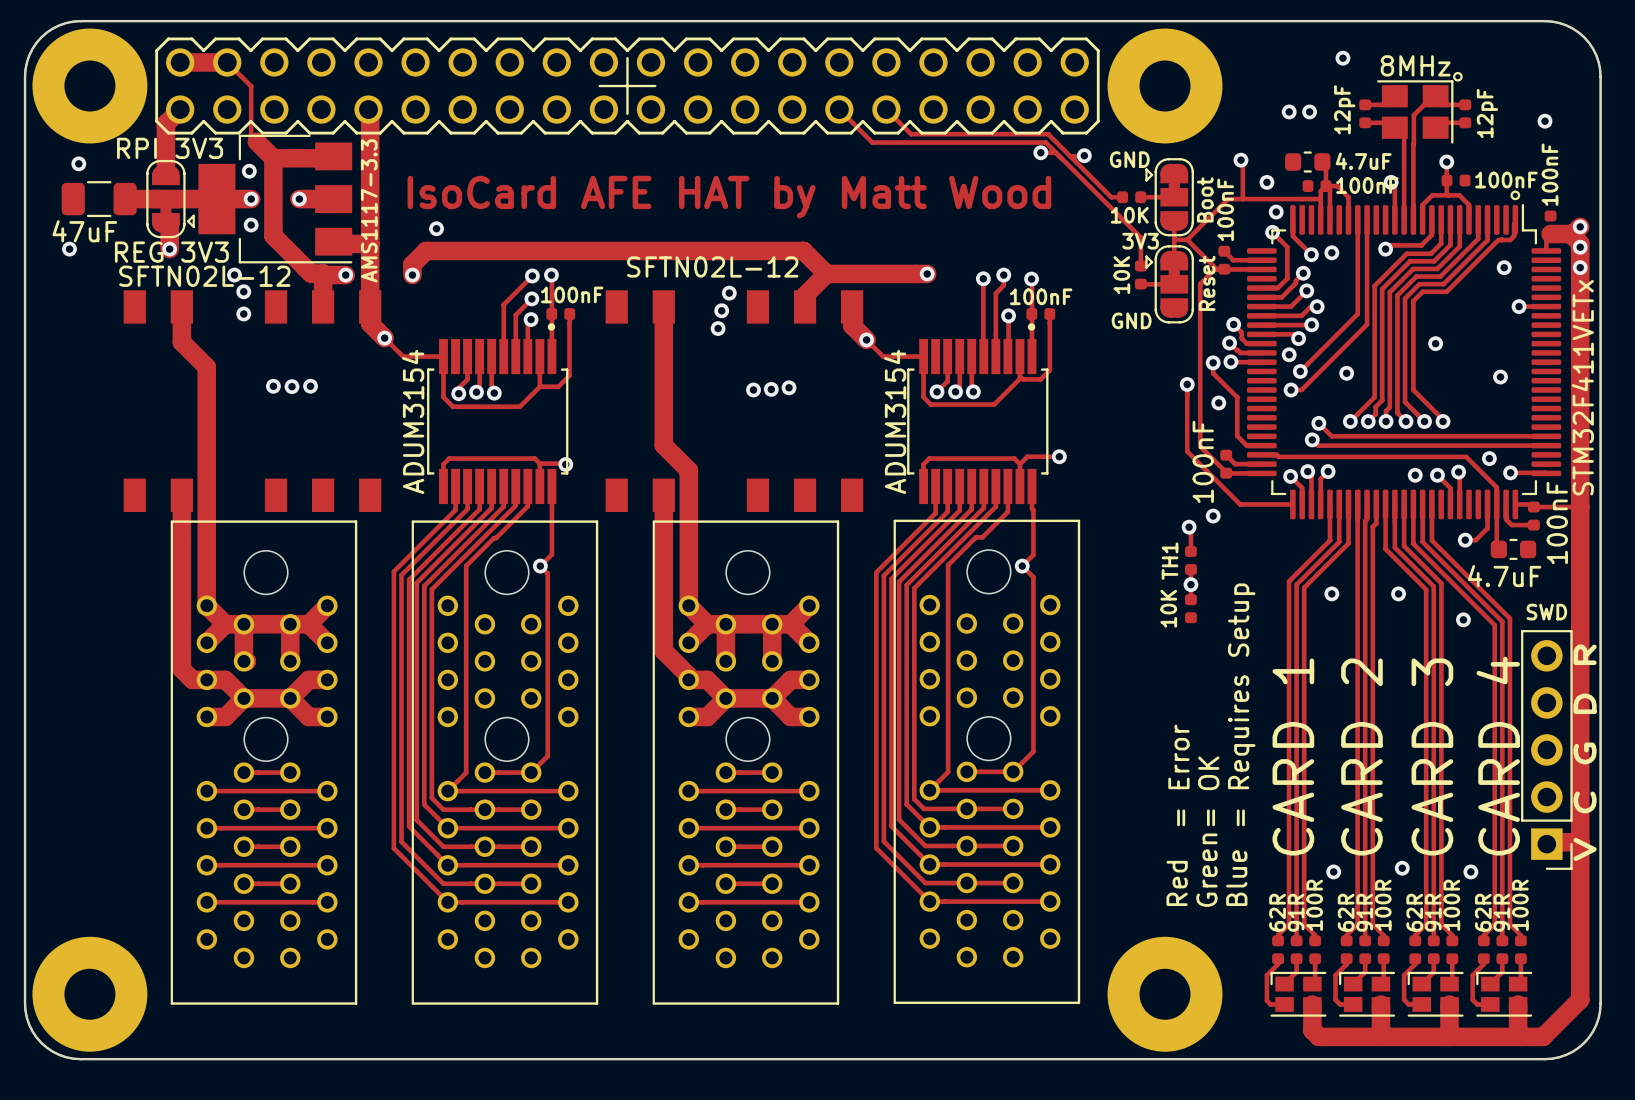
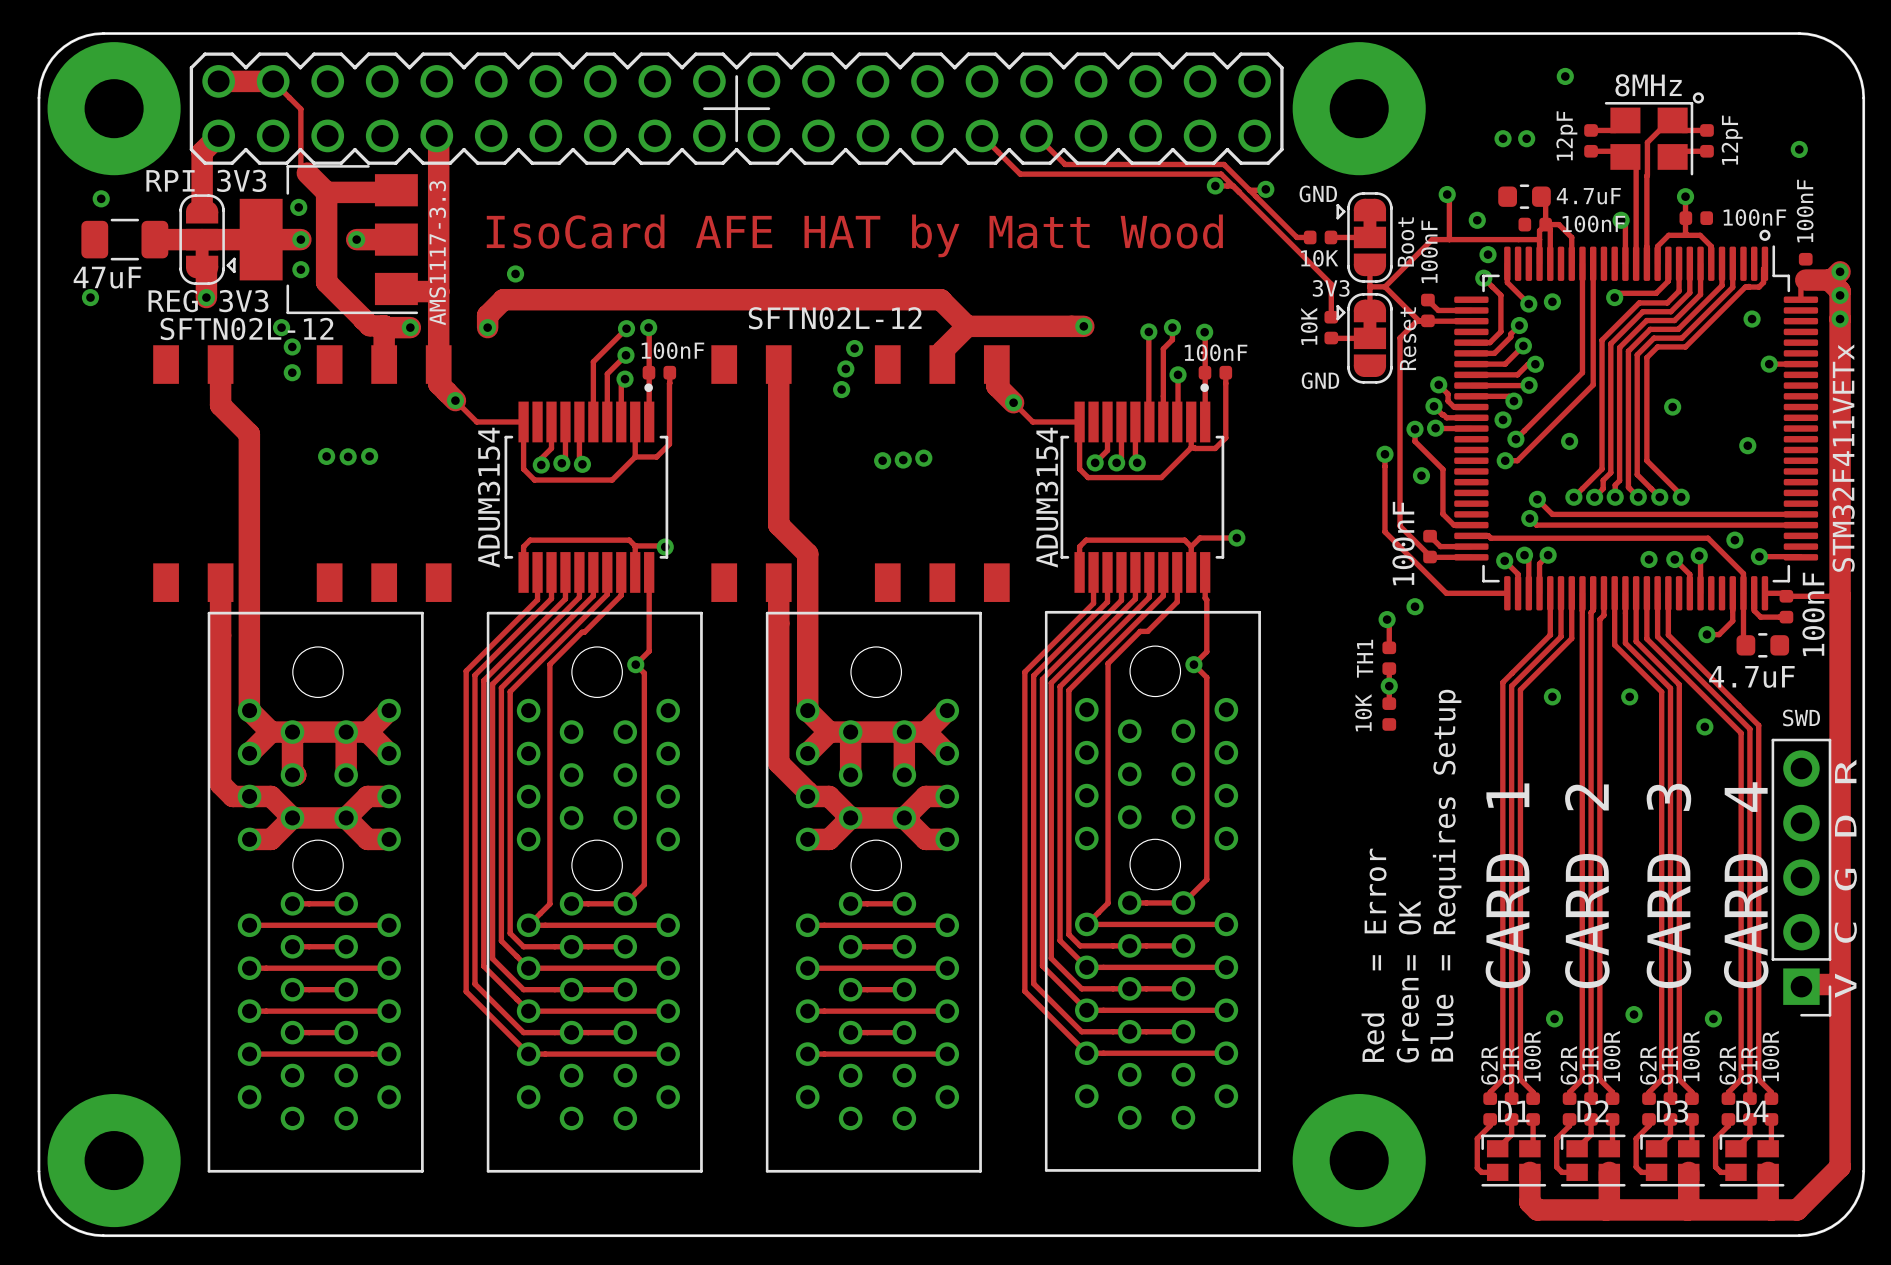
D1 name: none -> D1 (1513, 1111)
D2 name: none -> D2 (1592, 1111)
D3 name: none -> D3 (1672, 1111)
D4 name: none -> D4 (1752, 1111)

